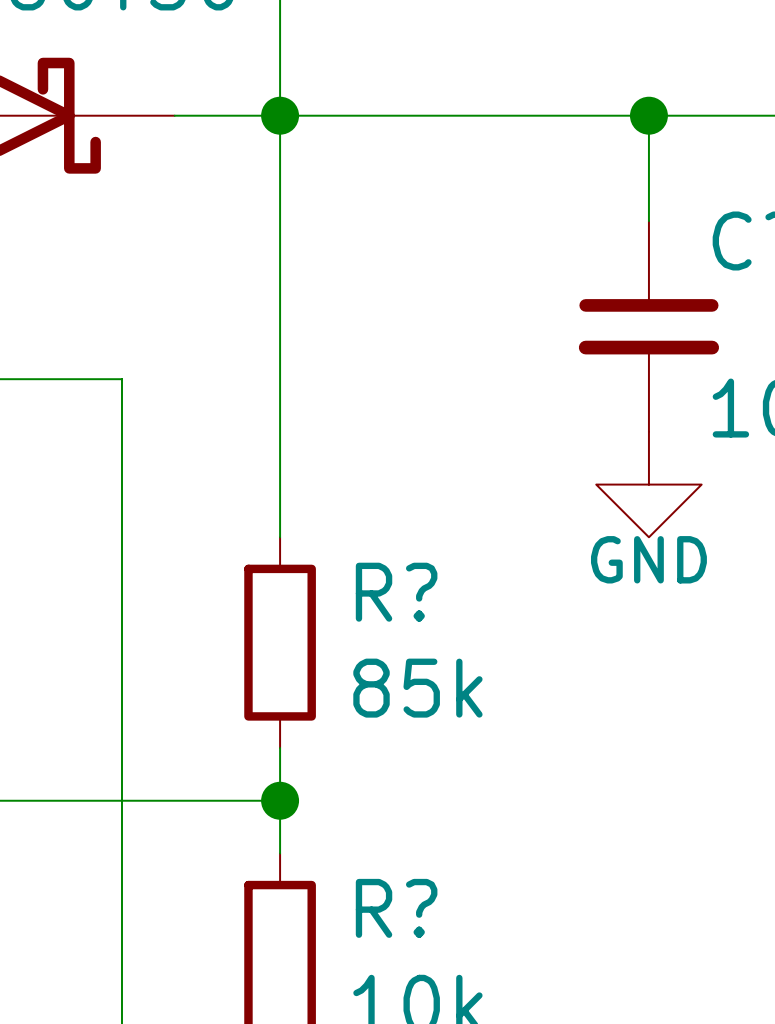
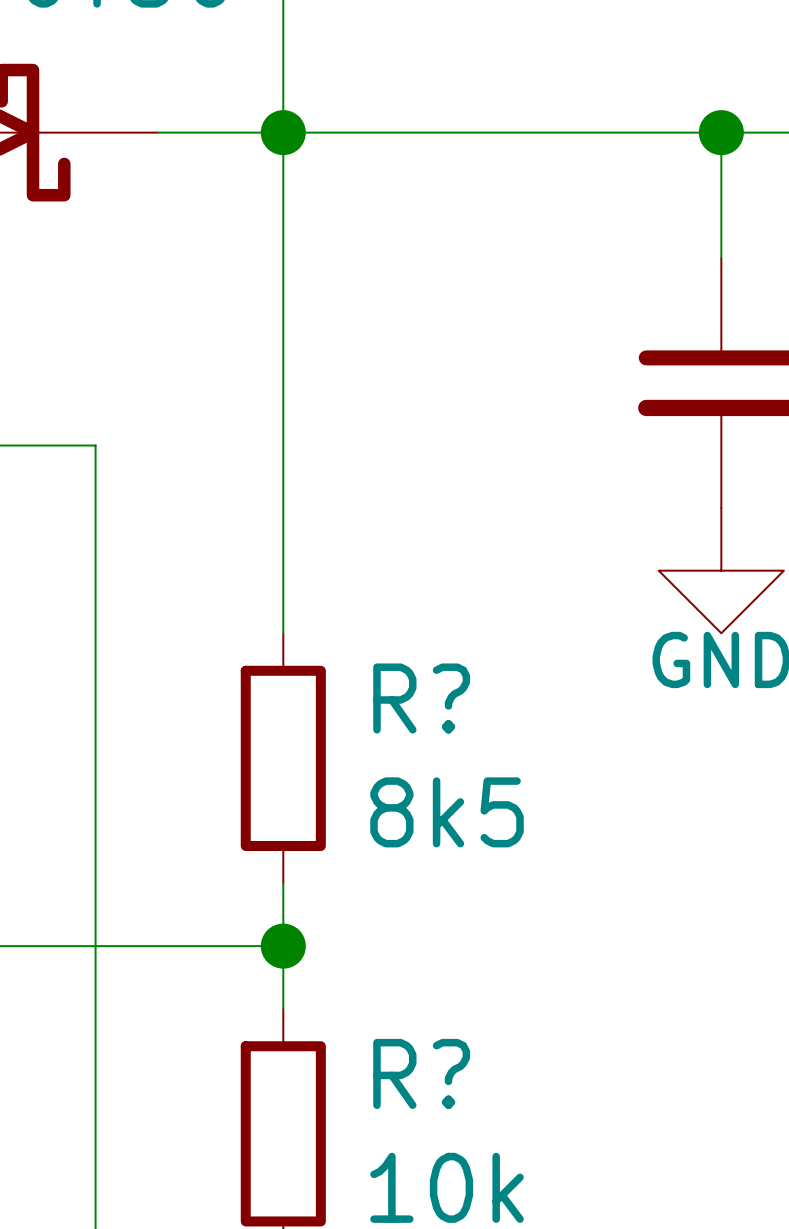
R? value: 85k (417, 688) -> 8k5 (447, 812)

